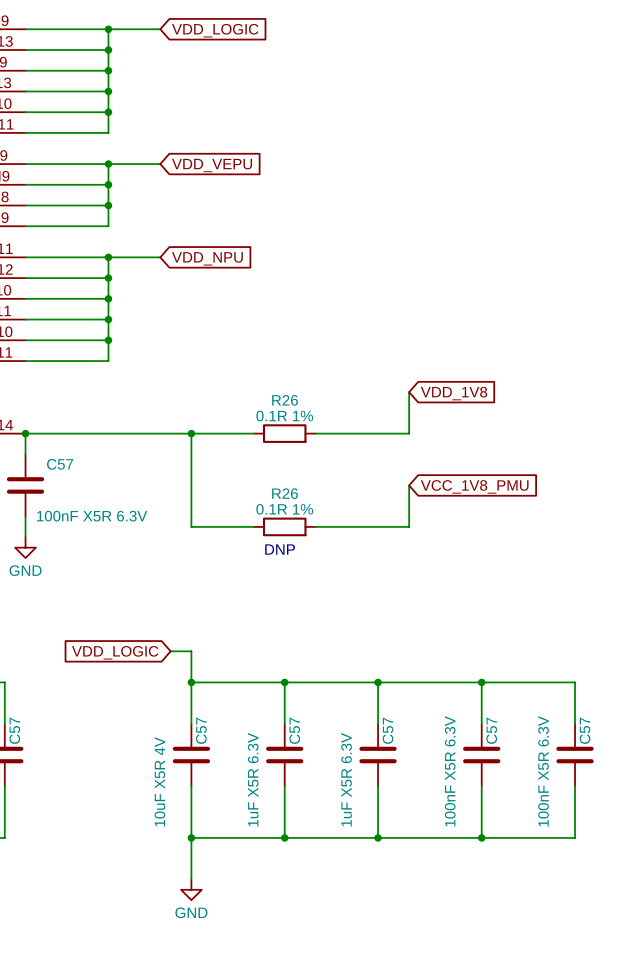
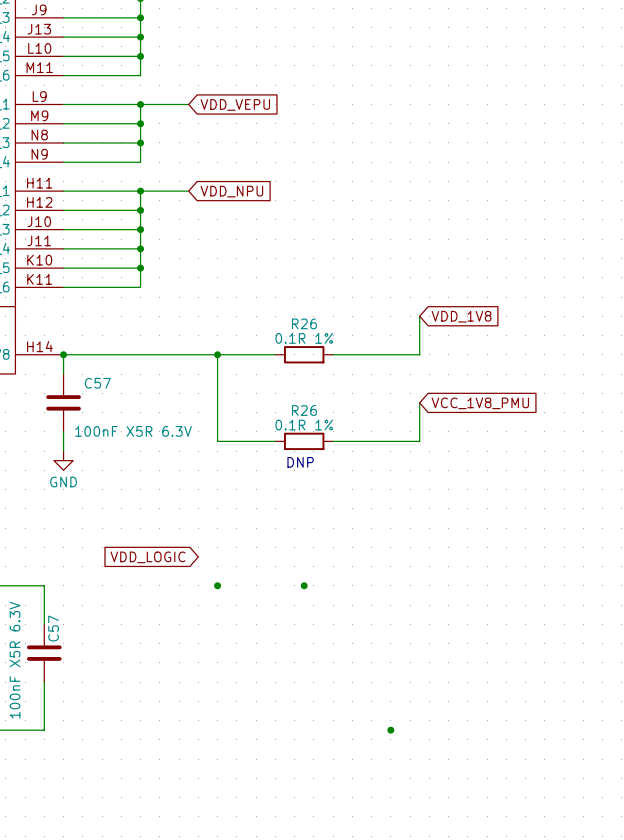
wire: (170, 651) (191, 651) (191, 723) -> none
wire: (191, 682) (575, 682) (575, 723) -> none
wire: (284, 682) (284, 723) -> none
wire: (378, 682) (378, 723) -> none
junction: (378, 682) -> none
wire: (481, 682) (481, 723) -> none
junction: (481, 682) -> none
C57: 10uF X5R 4V (191, 755) -> none
C57: 1uF X5R 6.3V (284, 755) -> none
C57: 1uF X5R 6.3V (378, 755) -> none
C57: 100nF X5R 6.3V (481, 755) -> none
C57: 100nF X5R 6.3V (575, 755) -> none
wire: (191, 786) (191, 879) -> none
wire: (284, 786) (284, 837) -> none
wire: (378, 786) (378, 837) -> none
wire: (481, 786) (481, 837) -> none
wire: (575, 786) (575, 837) (191, 837) -> none
junction: (191, 837) -> none
junction: (284, 837) -> none
junction: (481, 837) -> none
power symbol: GND (191, 889) -> none

